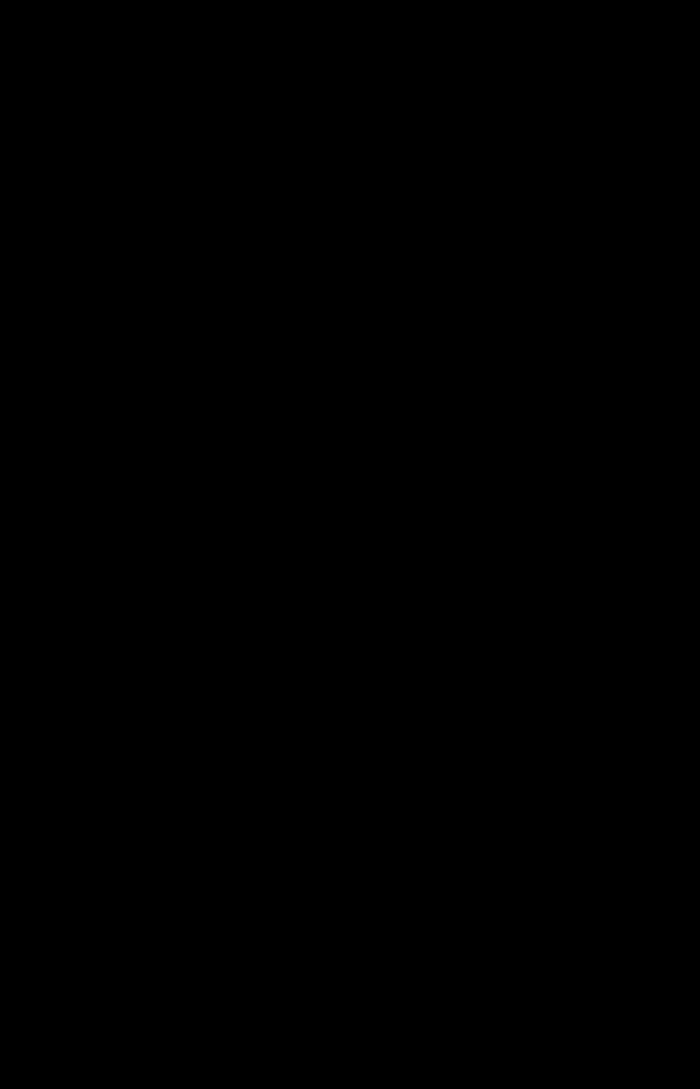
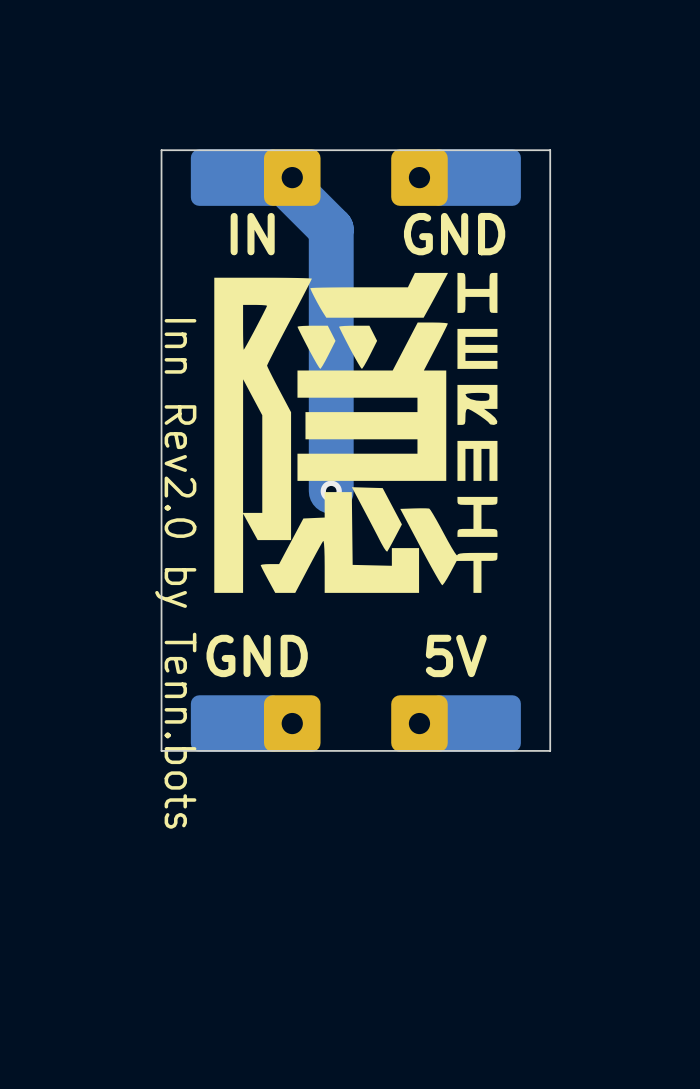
board edge: none -> (550, 150) (161, 150) (161, 750) (550, 750) (550, 150)
part: none -> (355, 177)
track: none -> (292, 190) (331, 229) (331, 491)
text: none -> IN (252, 234)
text: none -> GND (454, 234)
drawing: none -> [214, 272, 498, 593]
via: none -> (331, 491)
text: none -> Inn Rev2.0 by Tenn.bots (175, 573)
text: none -> GND (257, 655)
text: none -> 5V (456, 655)
part: none -> (355, 723)

